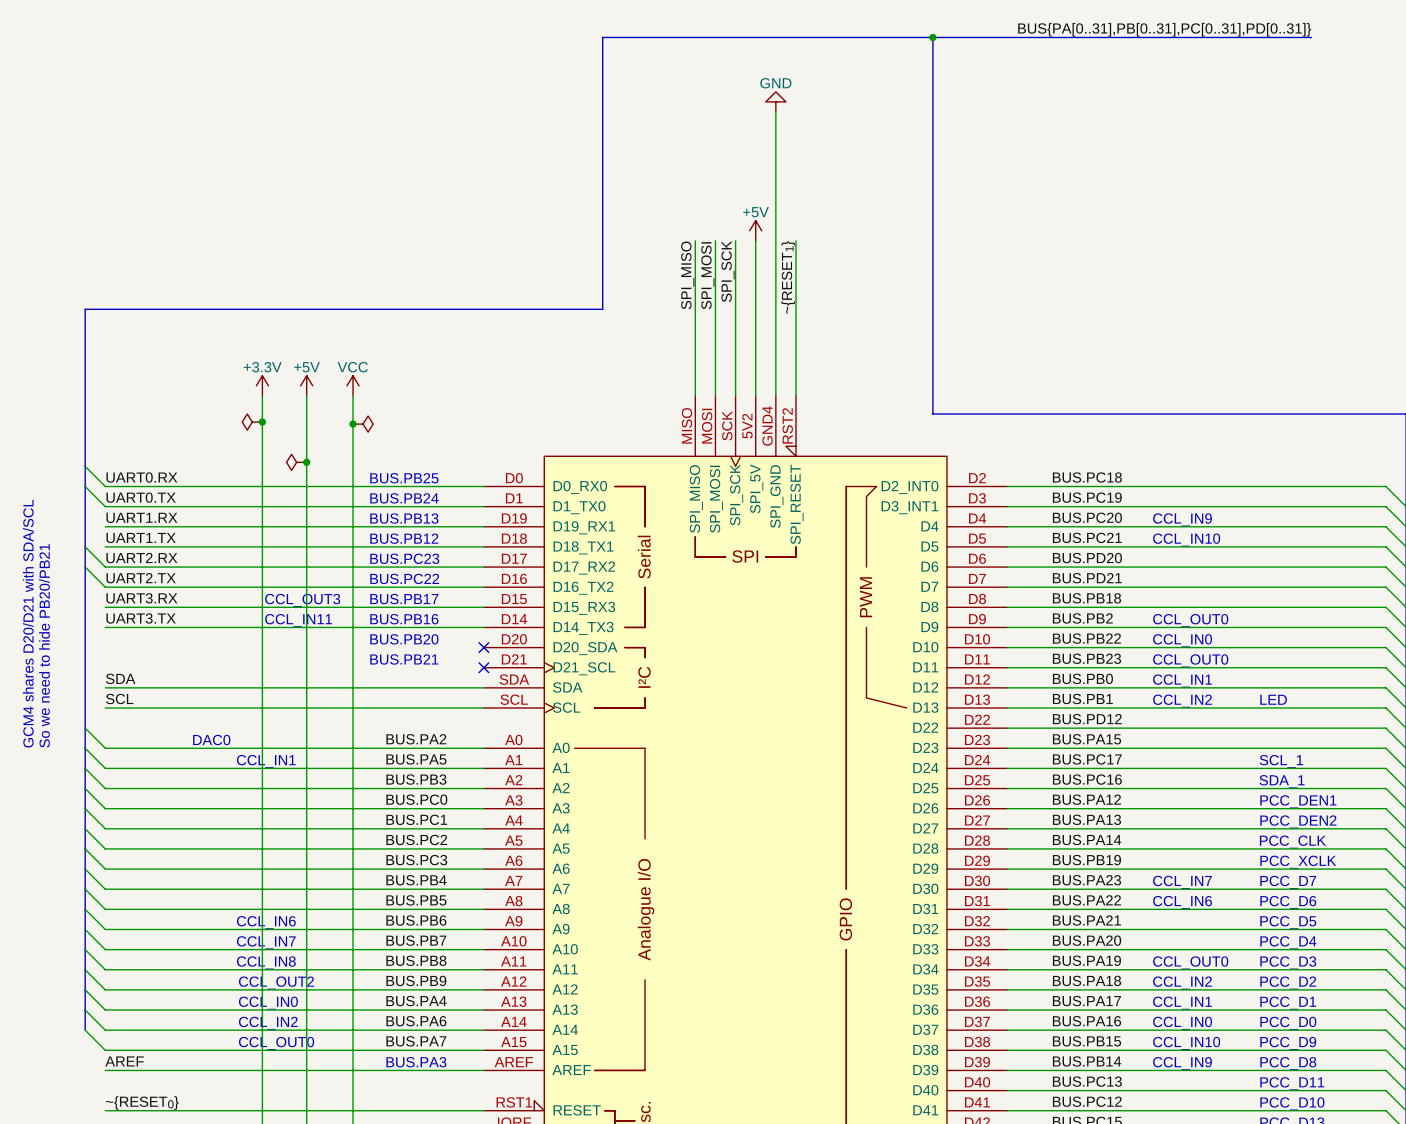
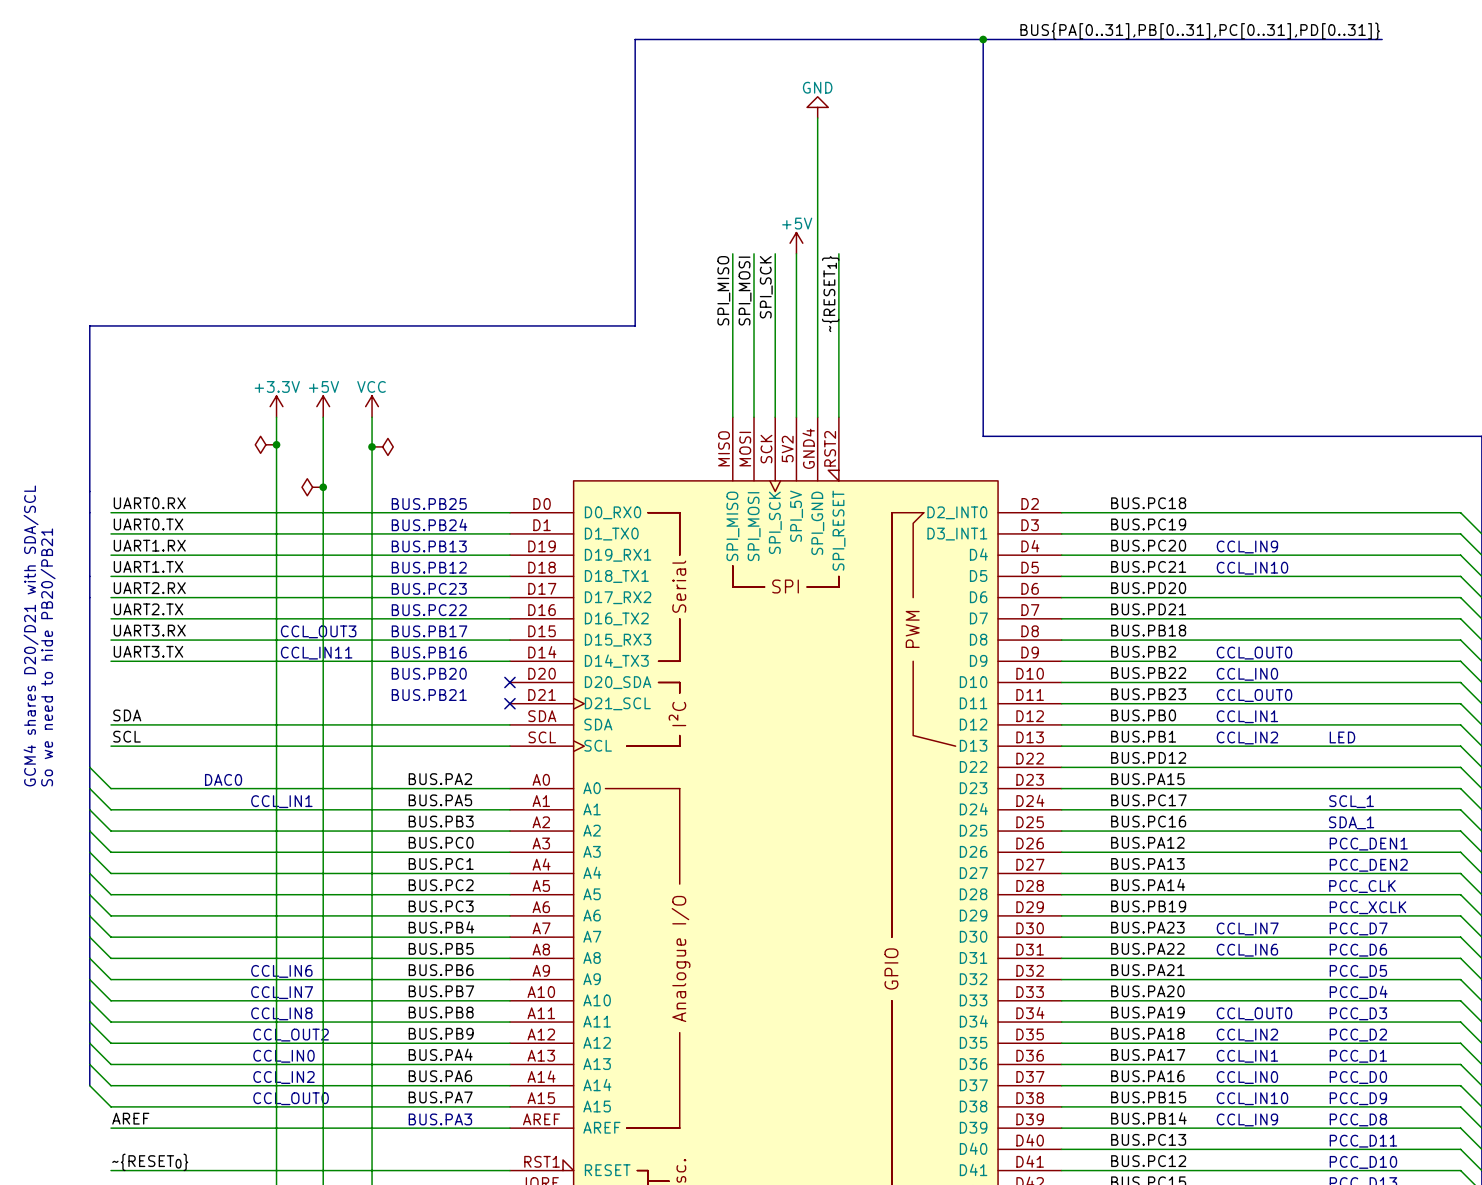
wire: (85, 466) (105, 486) -> none
wire: (85, 486) (105, 506) -> none
wire: (85, 546) (105, 567) -> none
wire: (85, 567) (105, 587) -> none

